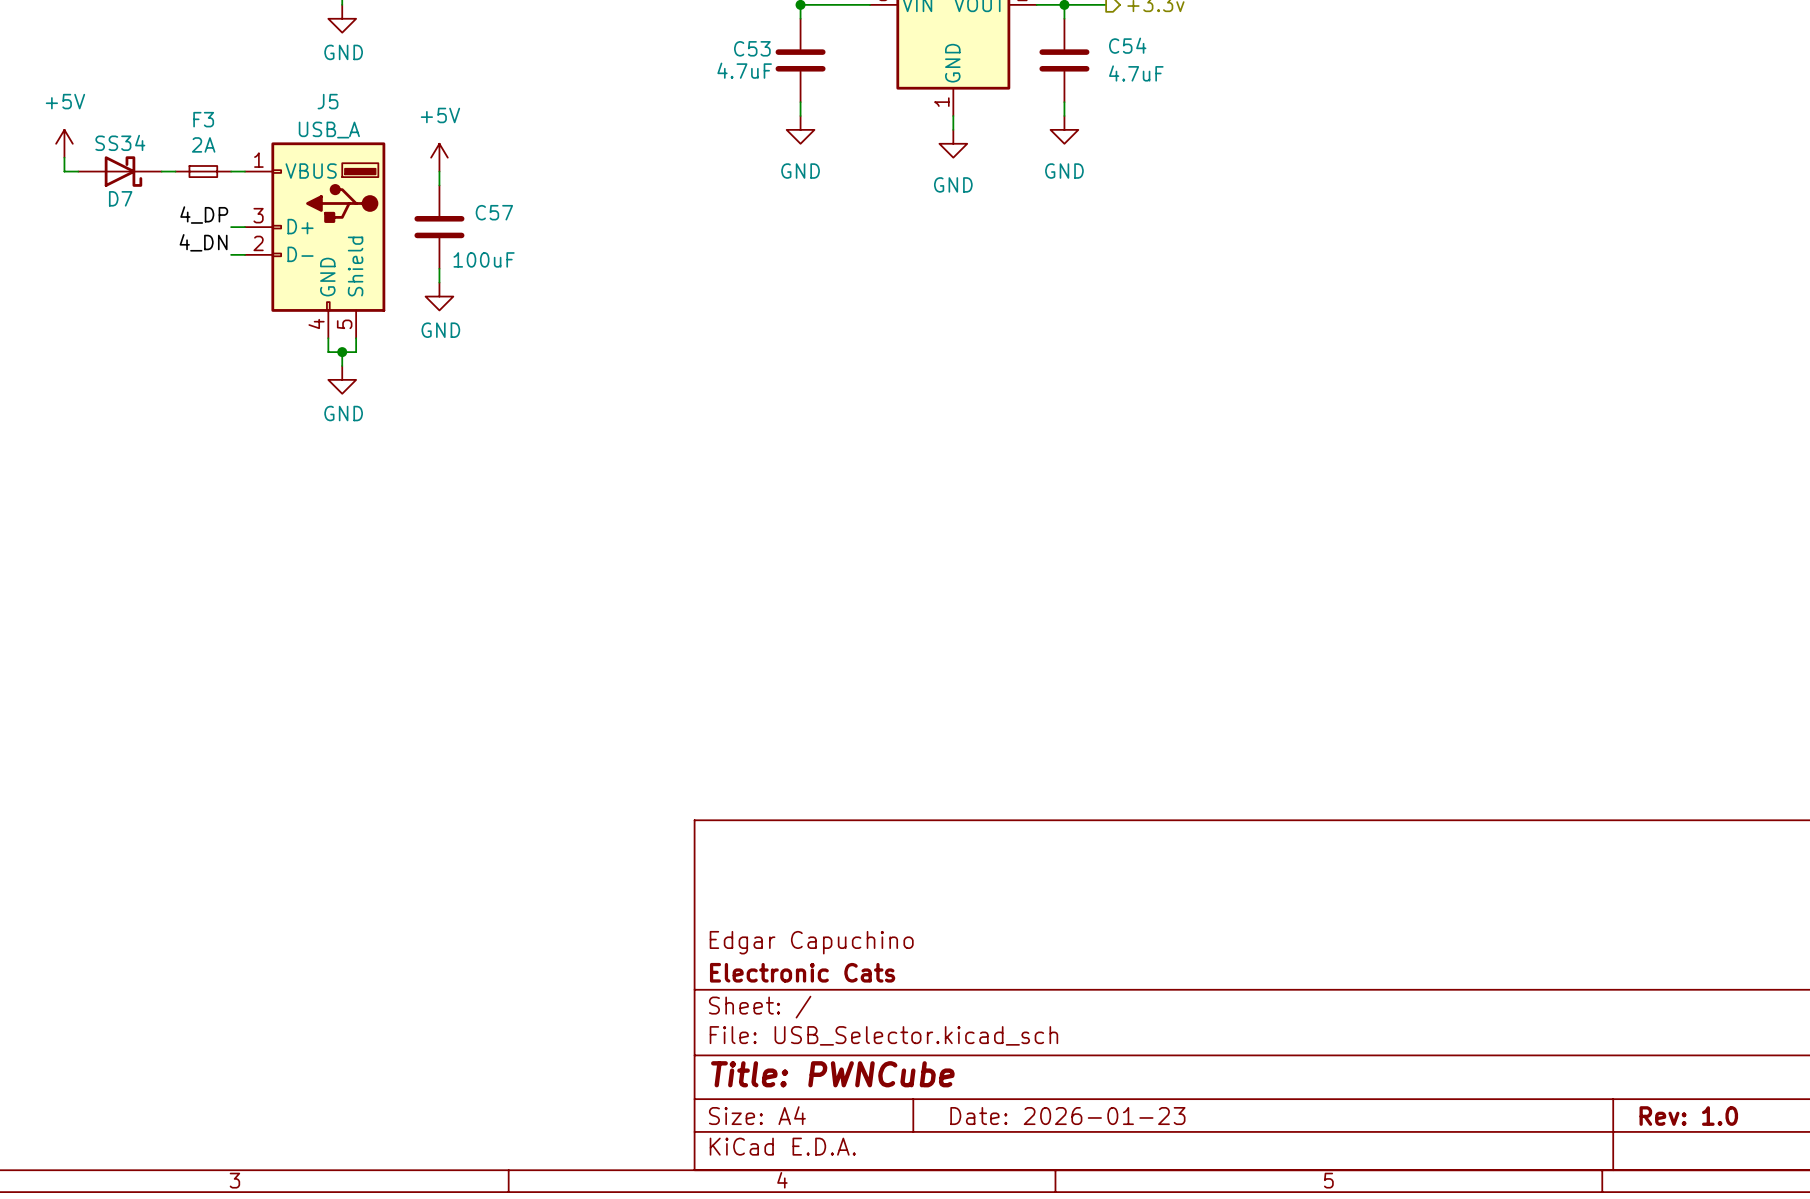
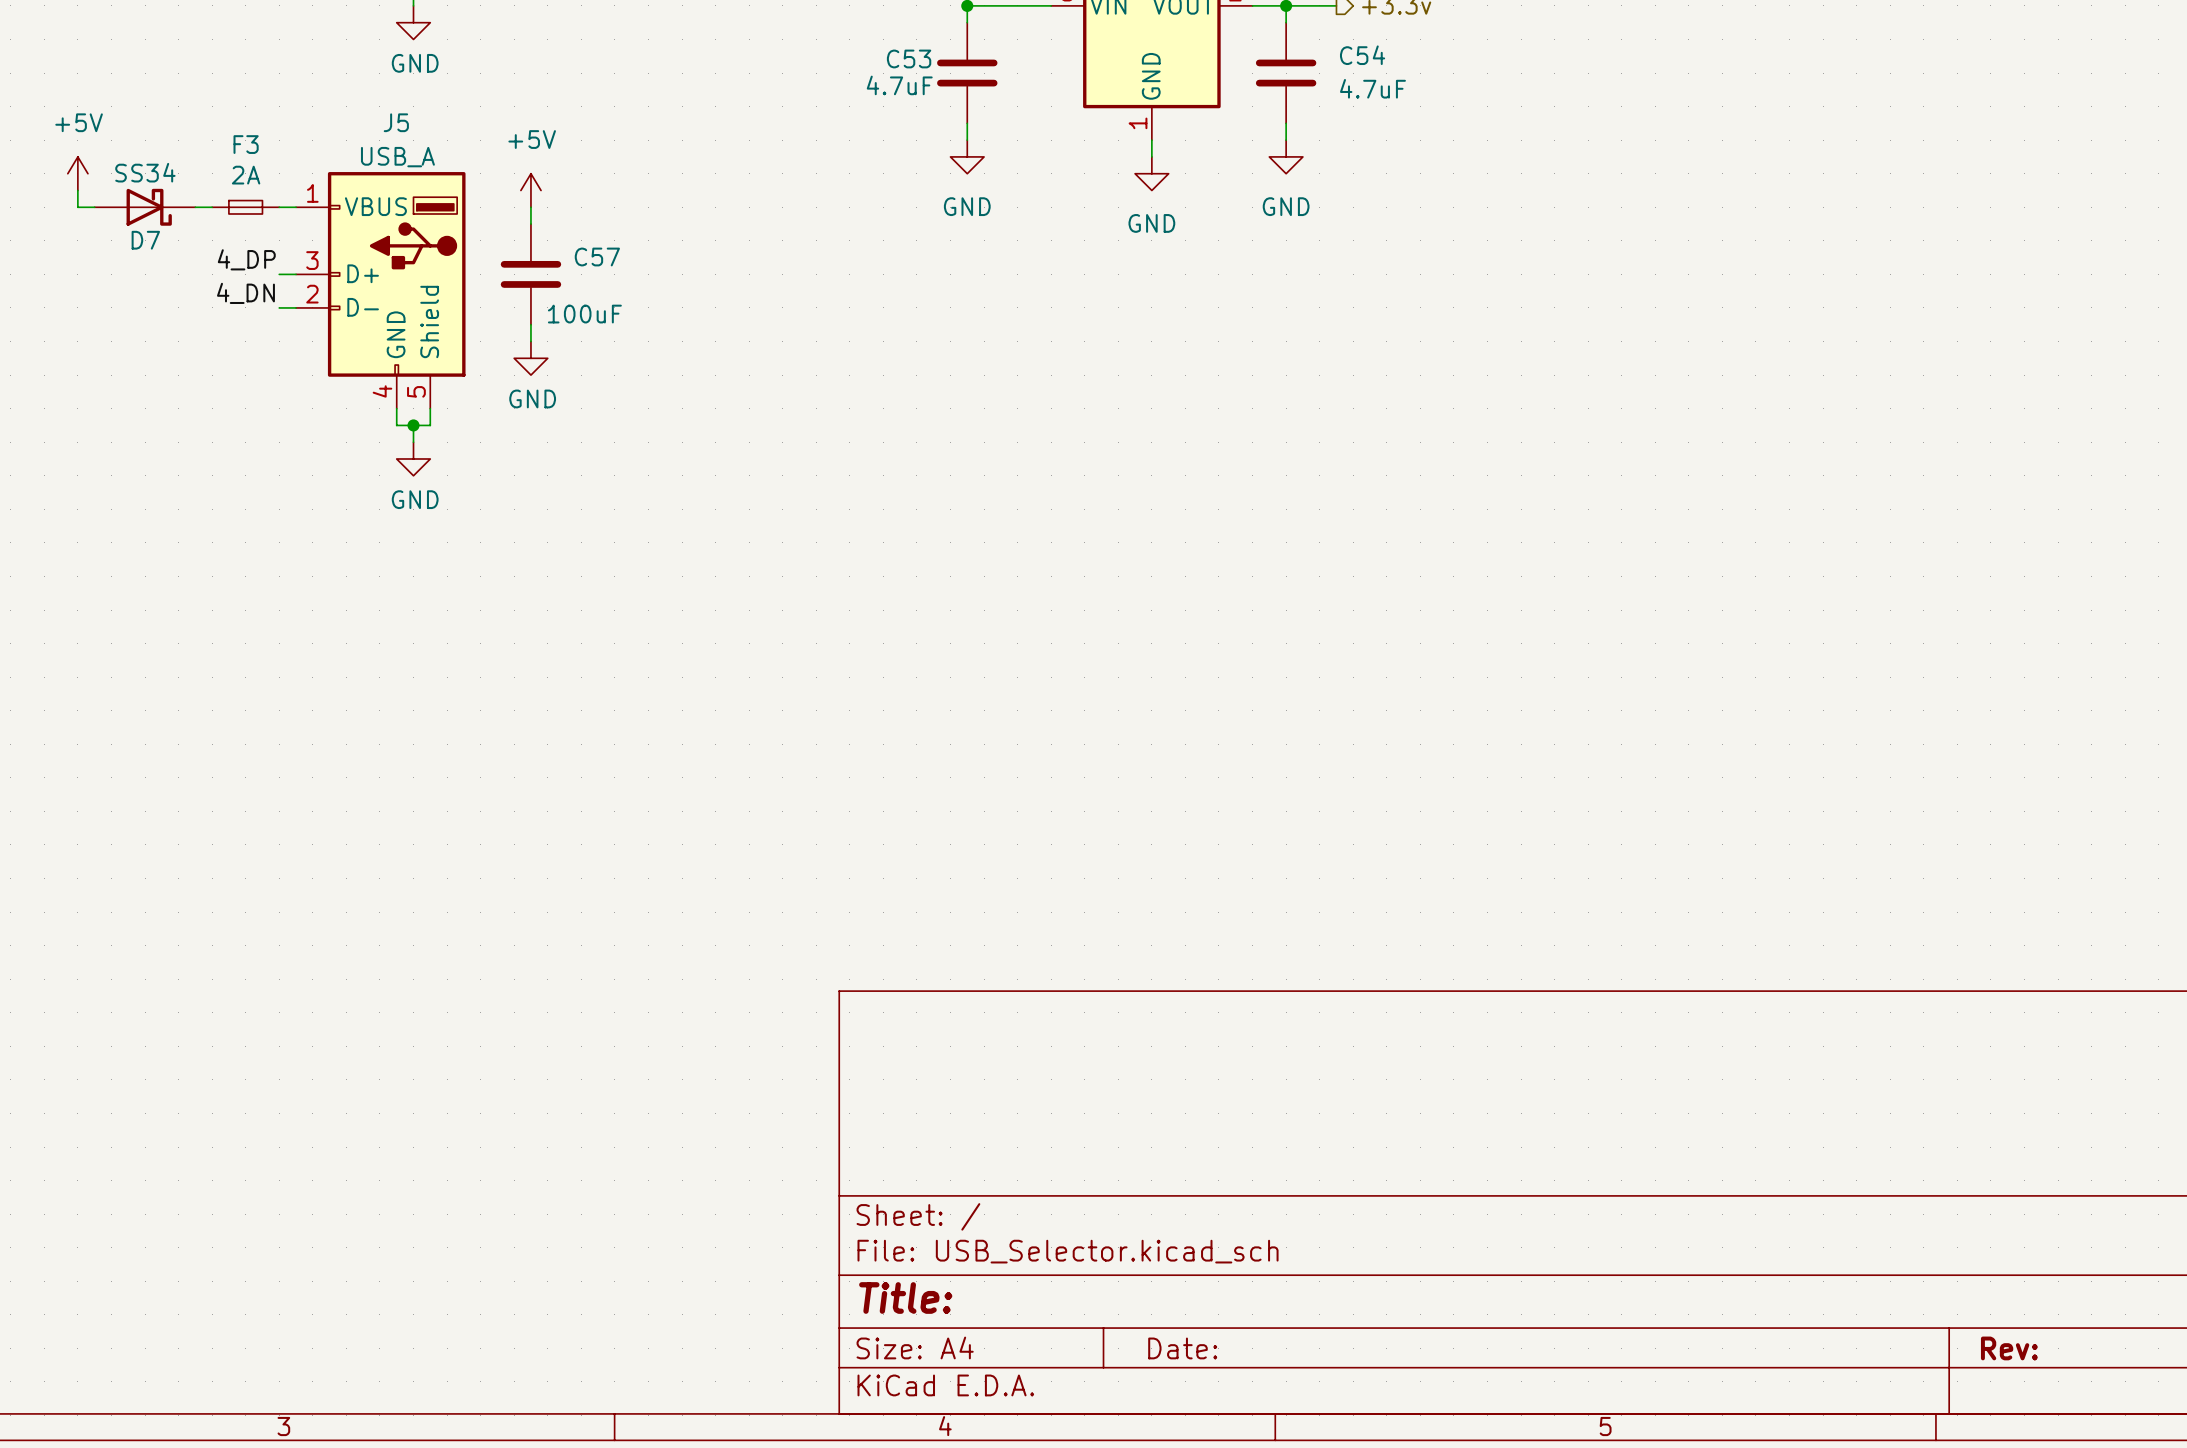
title block: Edgar Capuchino (811, 942) -> none
title block: Electronic Cats (802, 972) -> none
title block: Title: PWNCube (832, 1074) -> Title: (905, 1297)
title block: Date: 2026-01-23 (1067, 1116) -> Date: (1182, 1348)
title block: Rev: 1.0 (1688, 1116) -> Rev: (2009, 1348)

